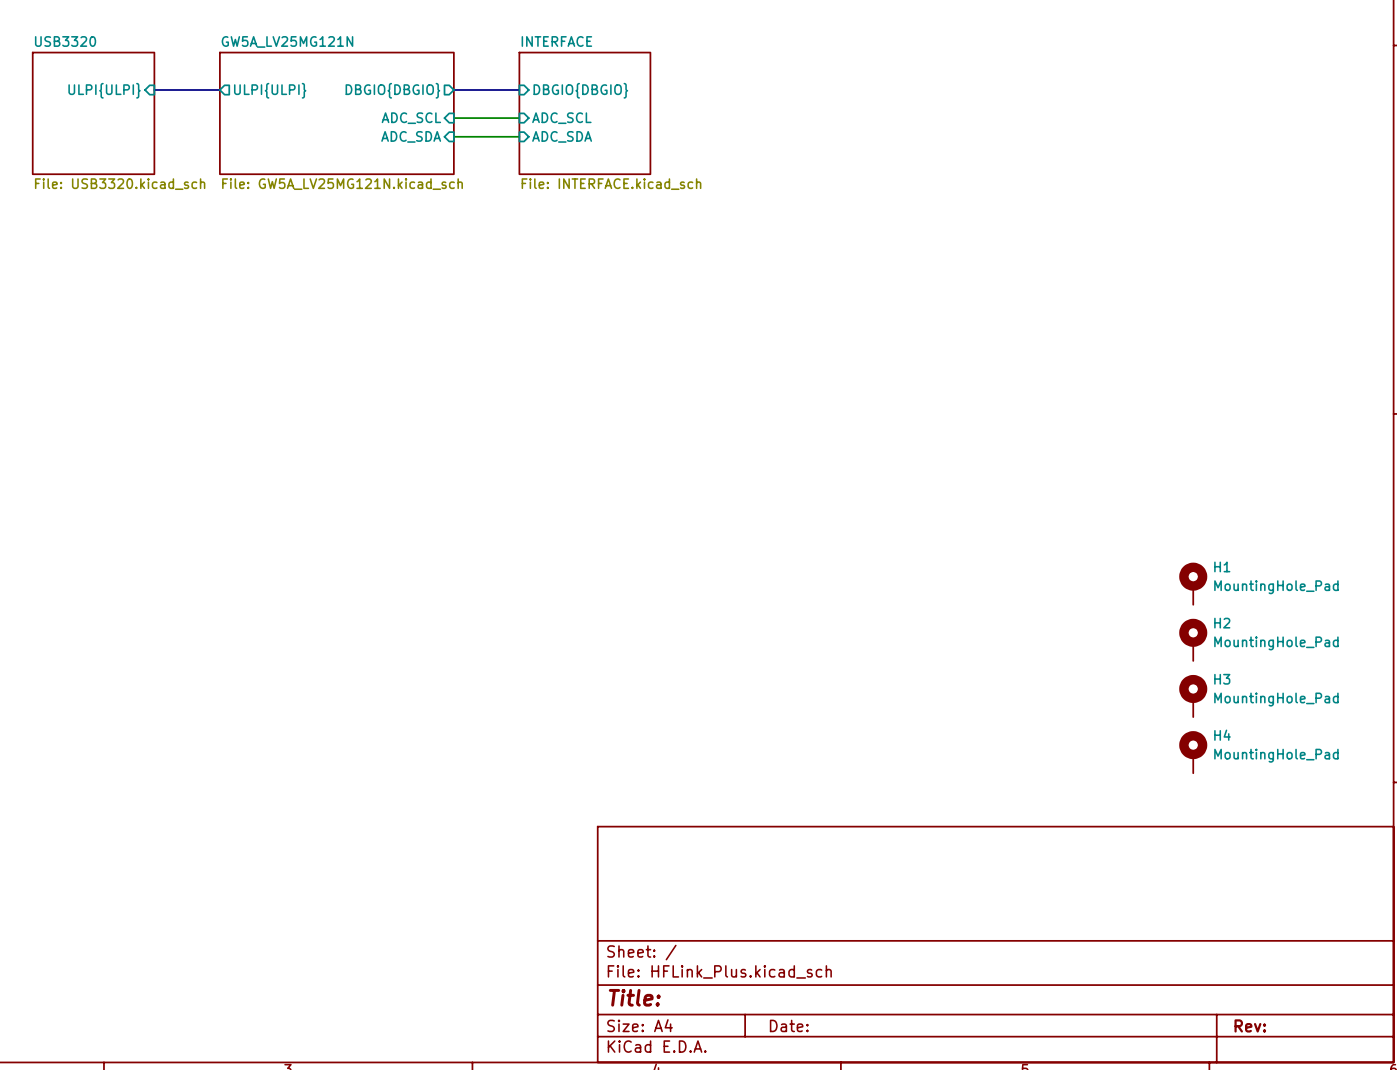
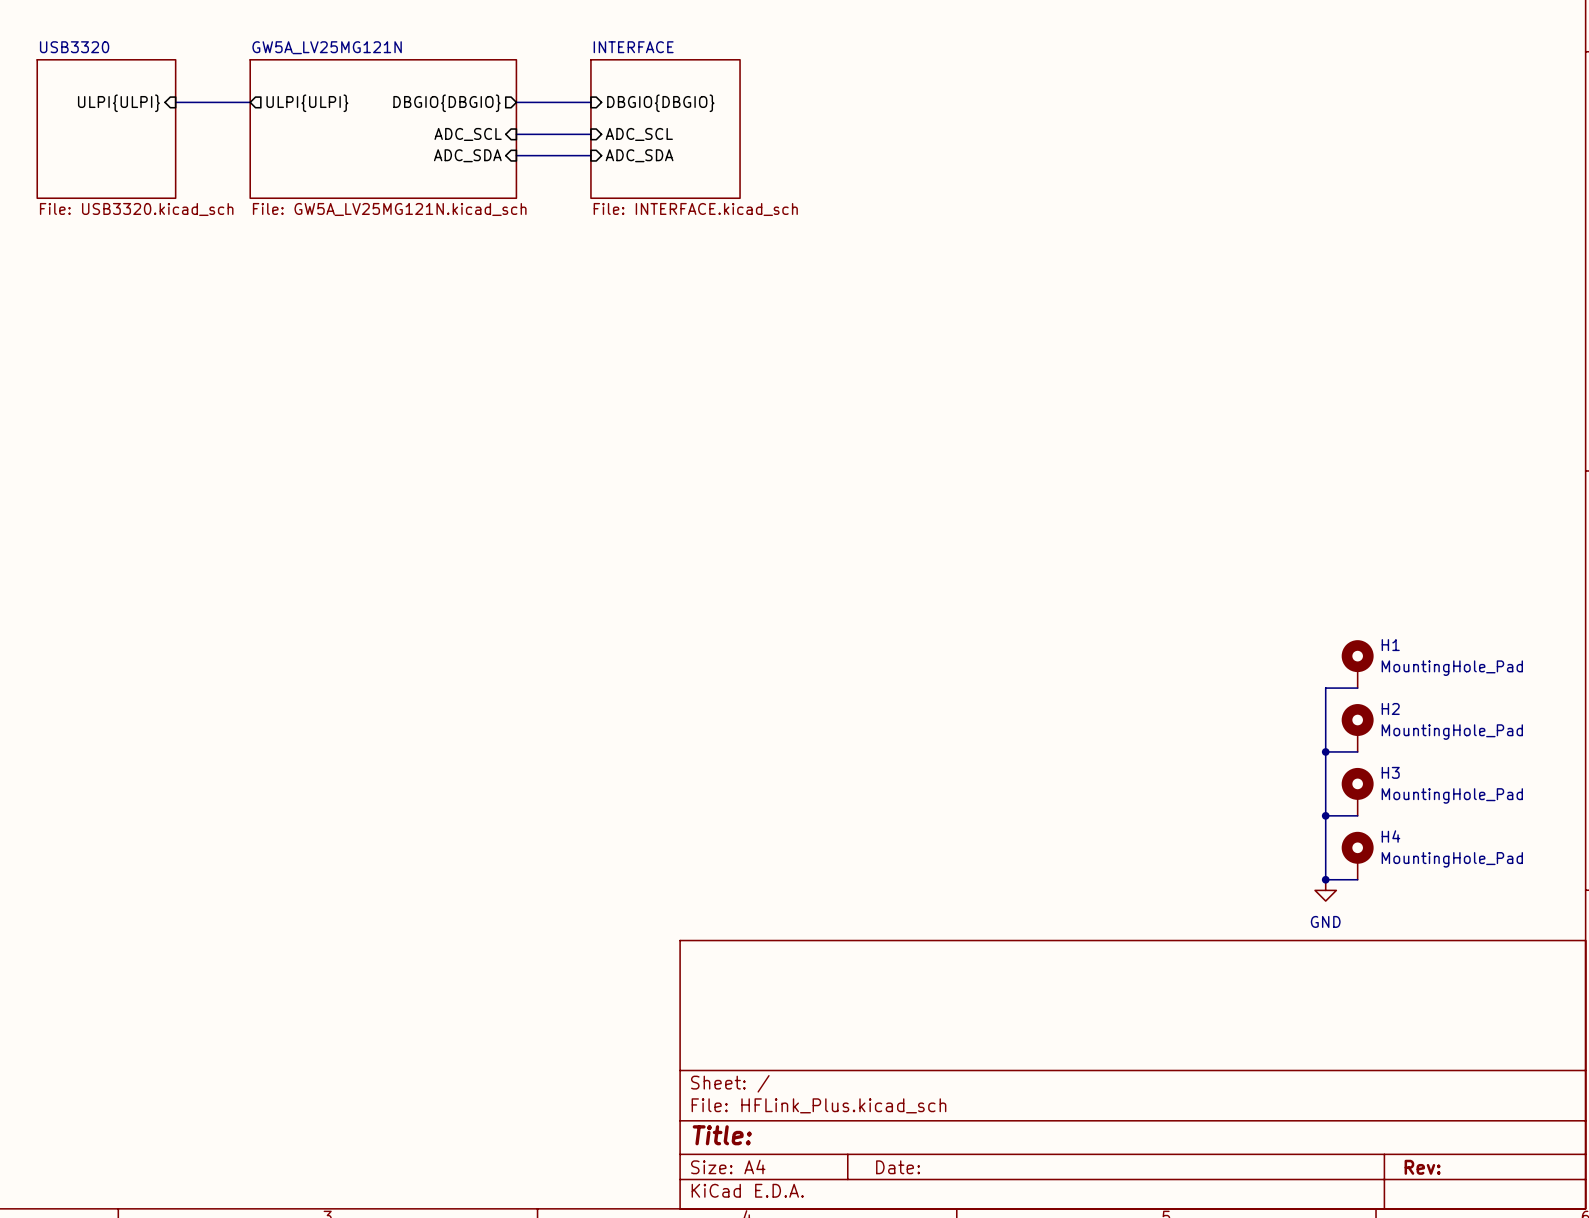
wire: none -> (1357, 688) (1325, 688) (1325, 879) (1357, 879)
wire: none -> (1325, 751) (1357, 751)
junction: none -> (1325, 751)
wire: none -> (1325, 815) (1357, 815)
junction: none -> (1325, 815)
junction: none -> (1325, 879)
power symbol: none -> GND (1325, 890)

